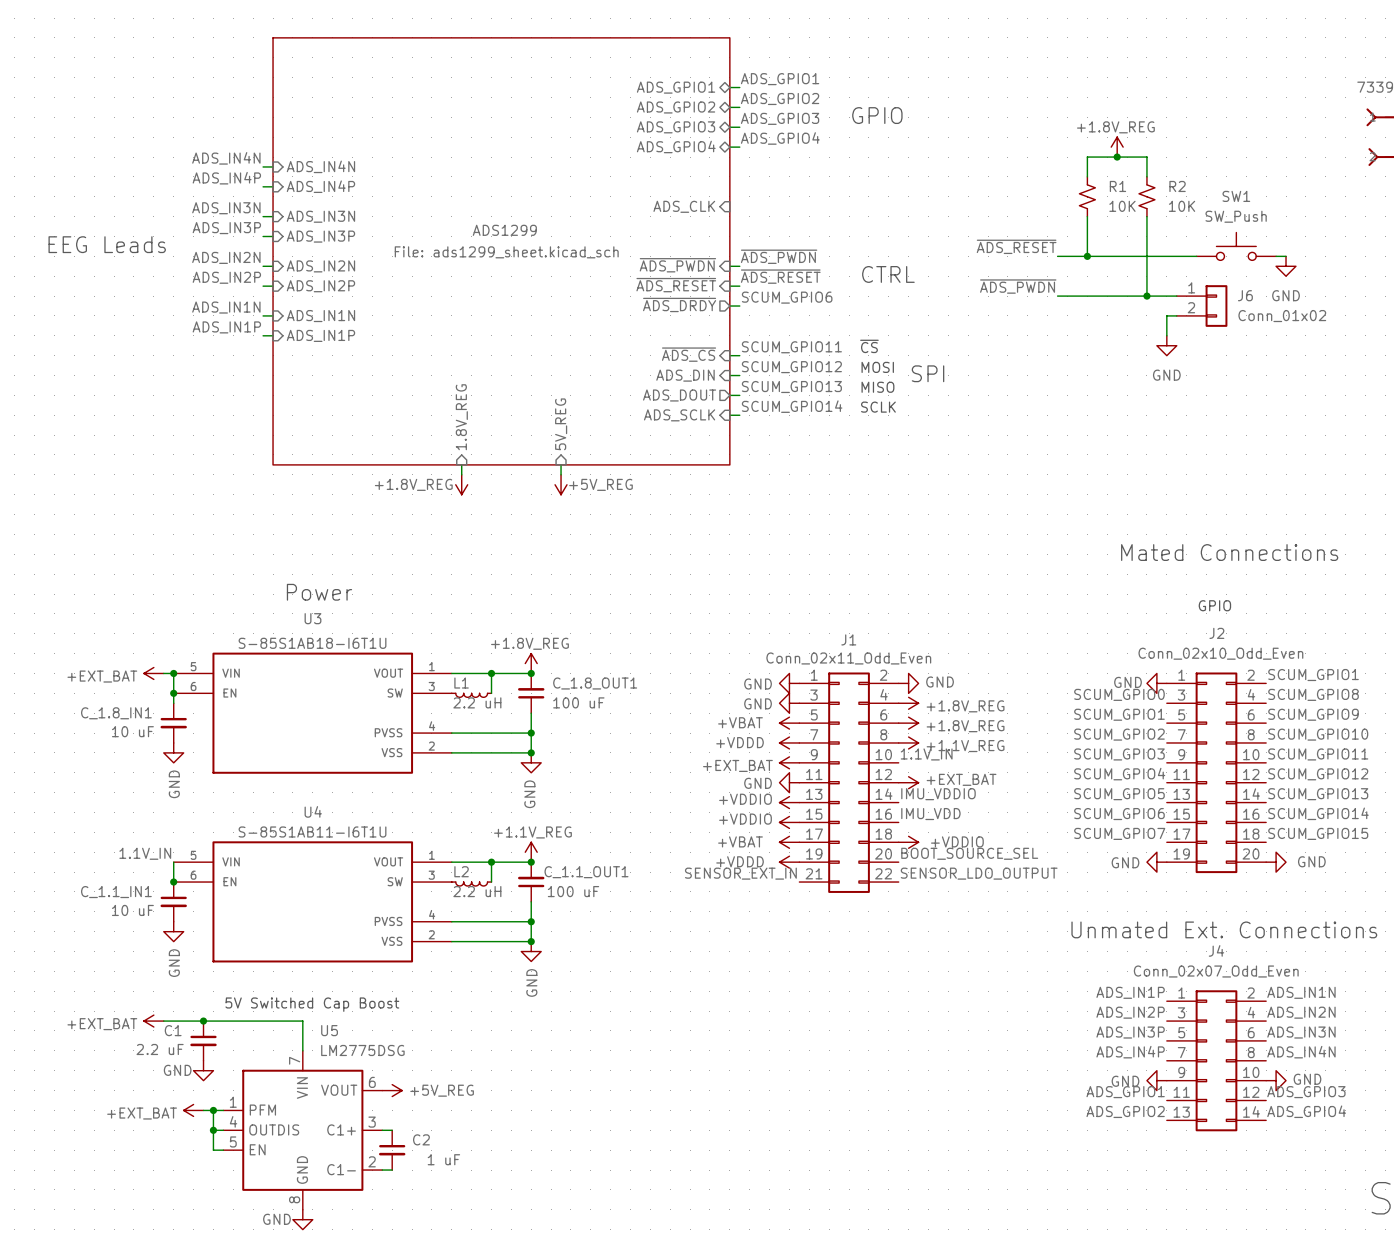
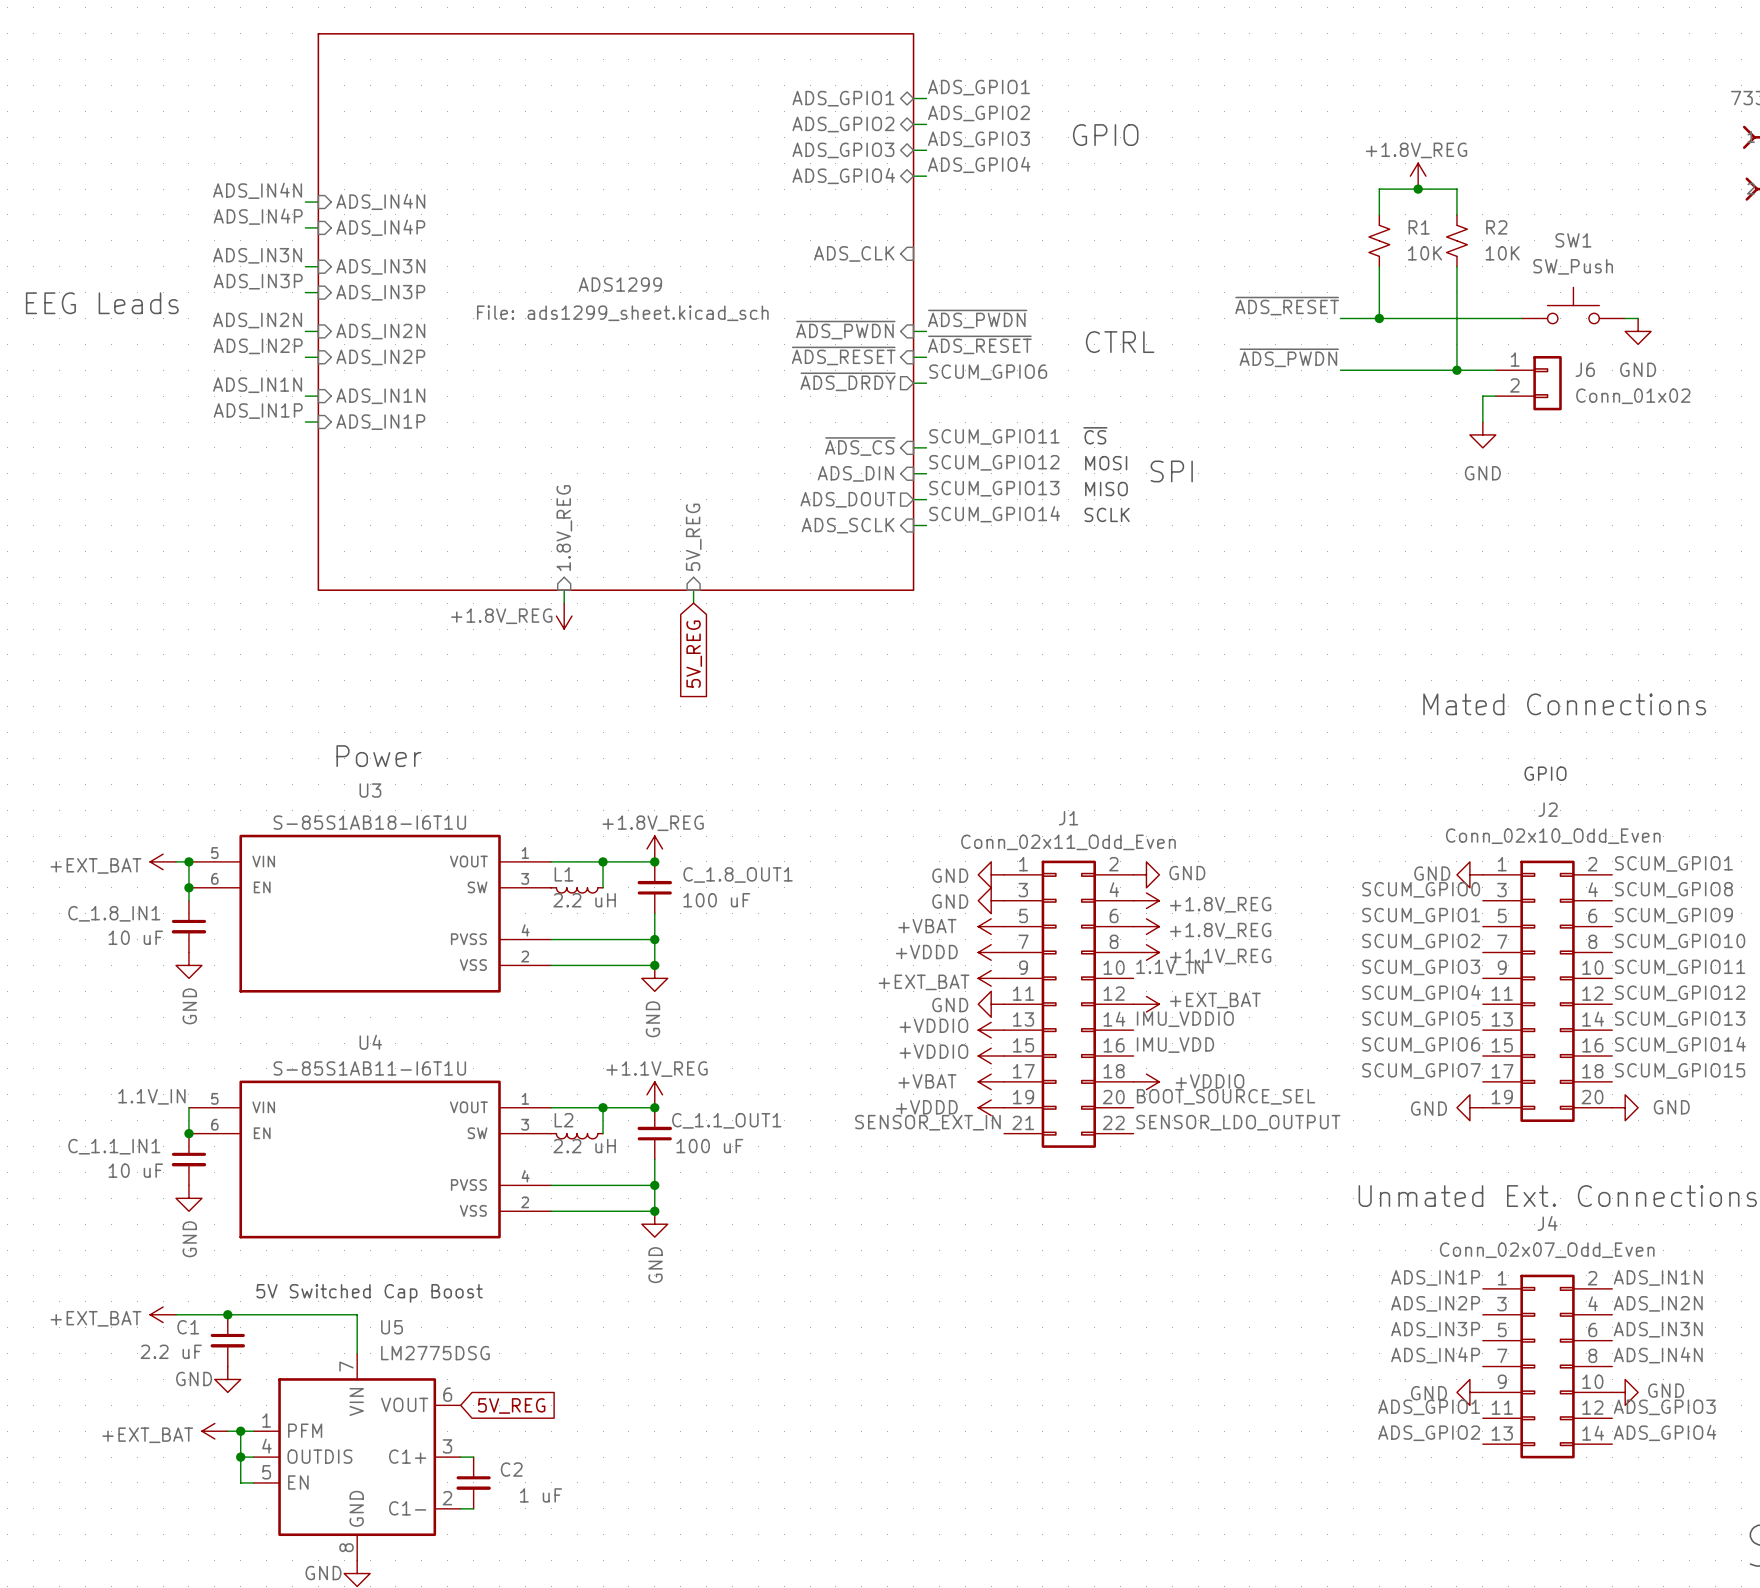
power symbol: +5V_REG (561, 484) -> none
global label: none -> 5V_REG (694, 654)
power symbol: +5V_REG (392, 1090) -> none
global label: none -> 5V_REG (511, 1405)

